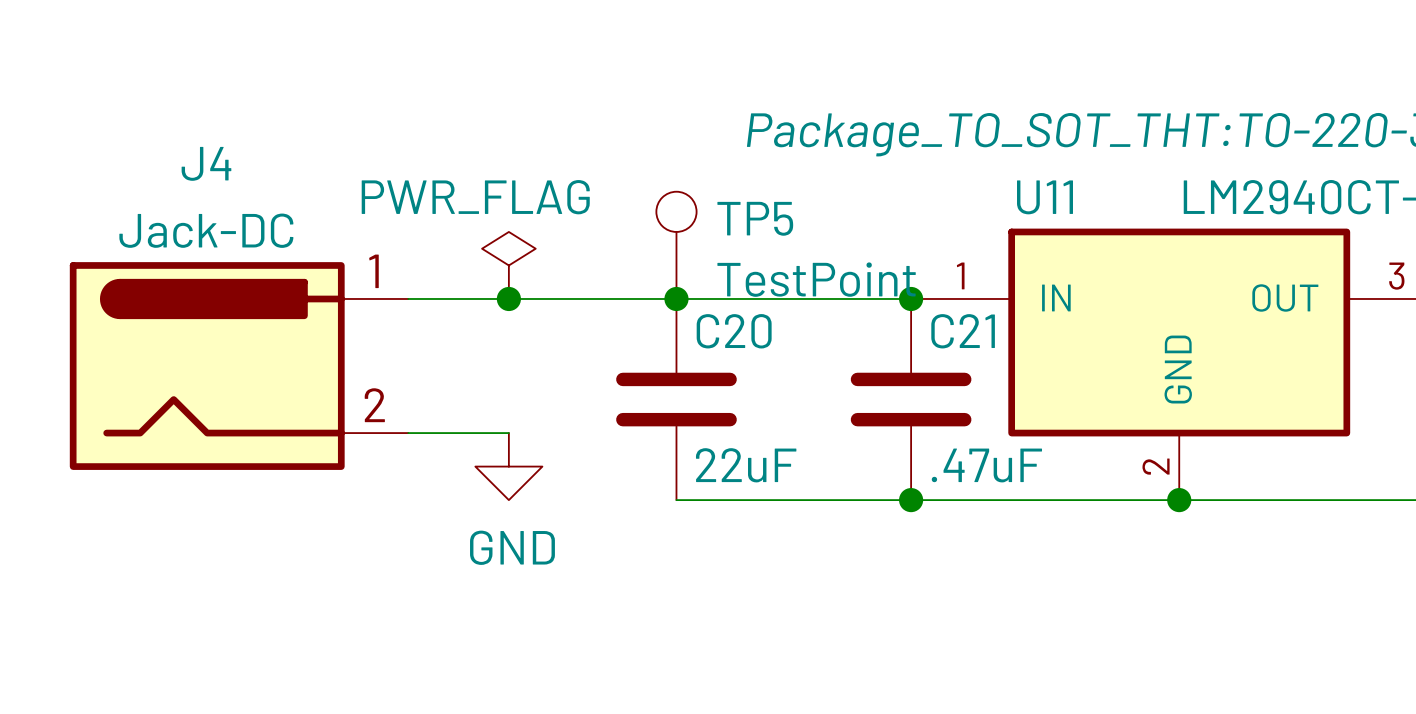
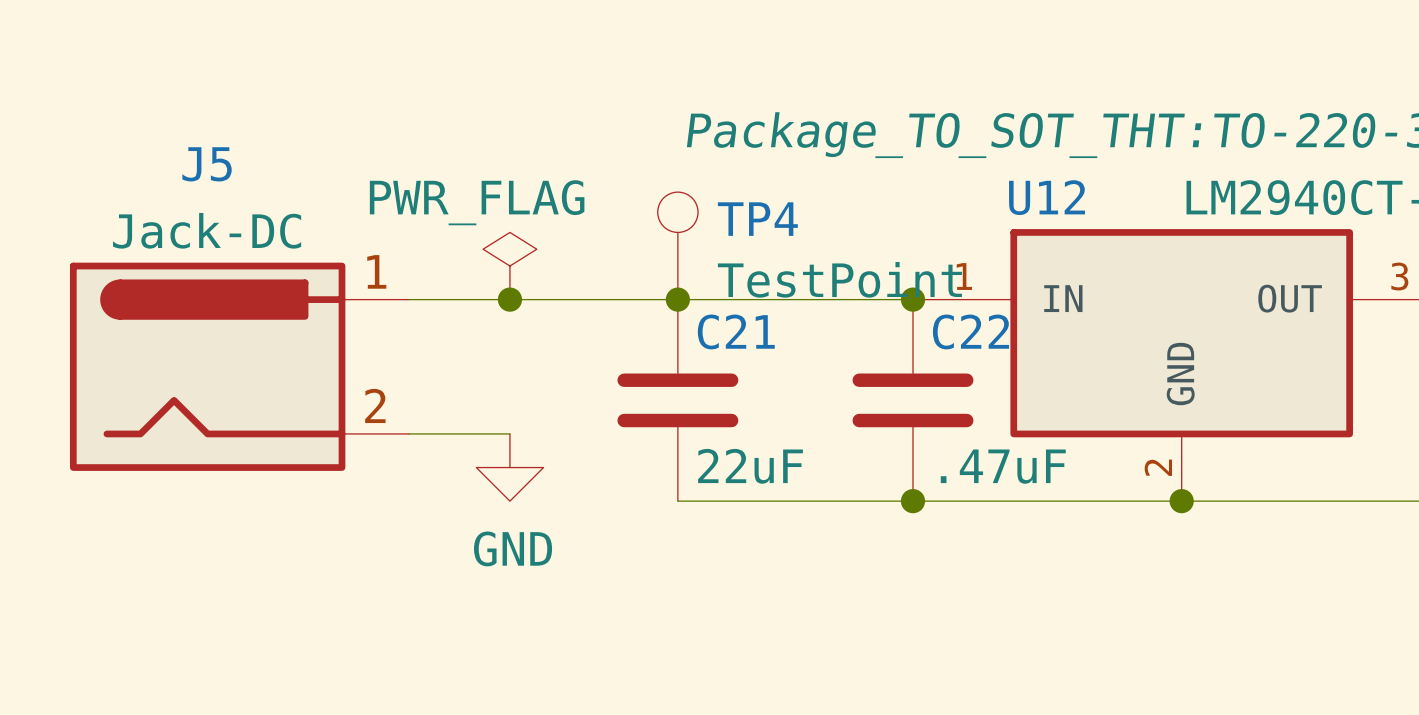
J4 name: J4 (206, 163) -> J5 (207, 164)
U11 name: U11 (1045, 197) -> U12 (1047, 197)
TP5 name: TP5 (755, 218) -> TP4 (757, 219)
C20 name: C20 (734, 331) -> C21 (736, 331)
C21 name: C21 (963, 331) -> C22 (970, 331)

